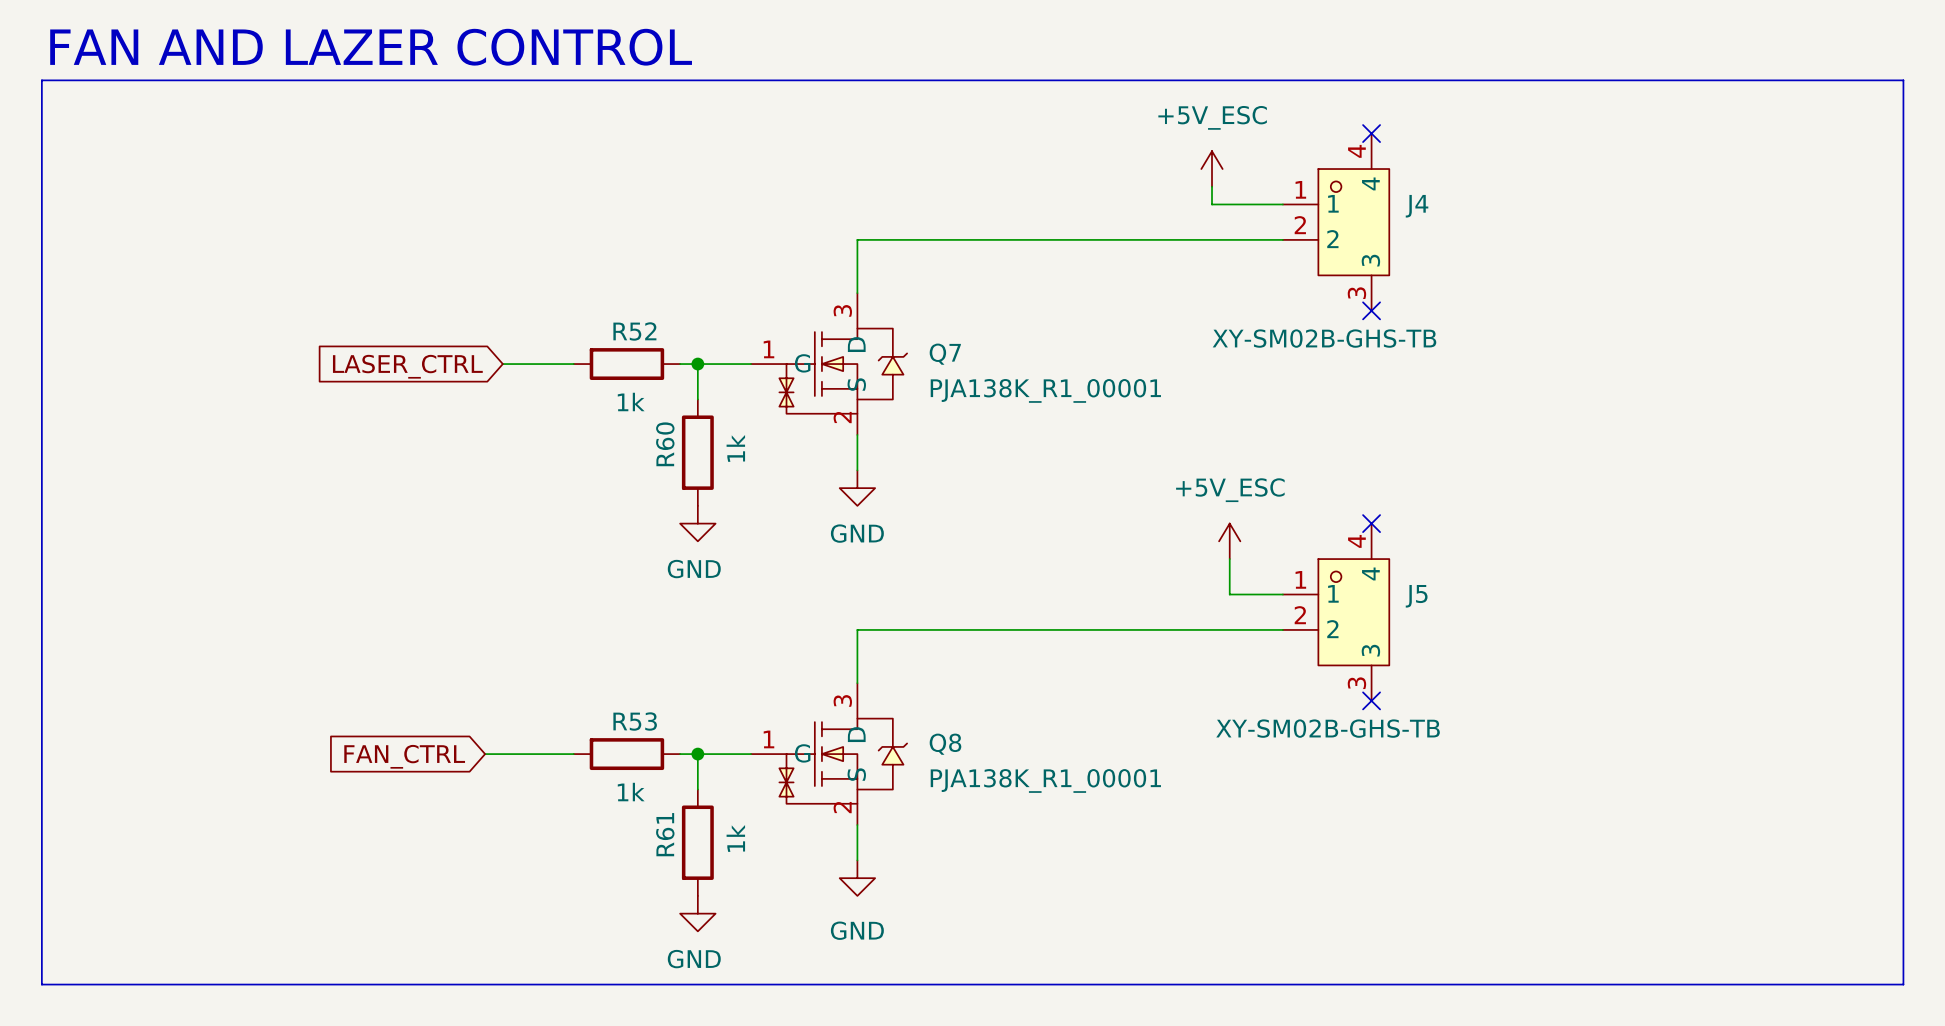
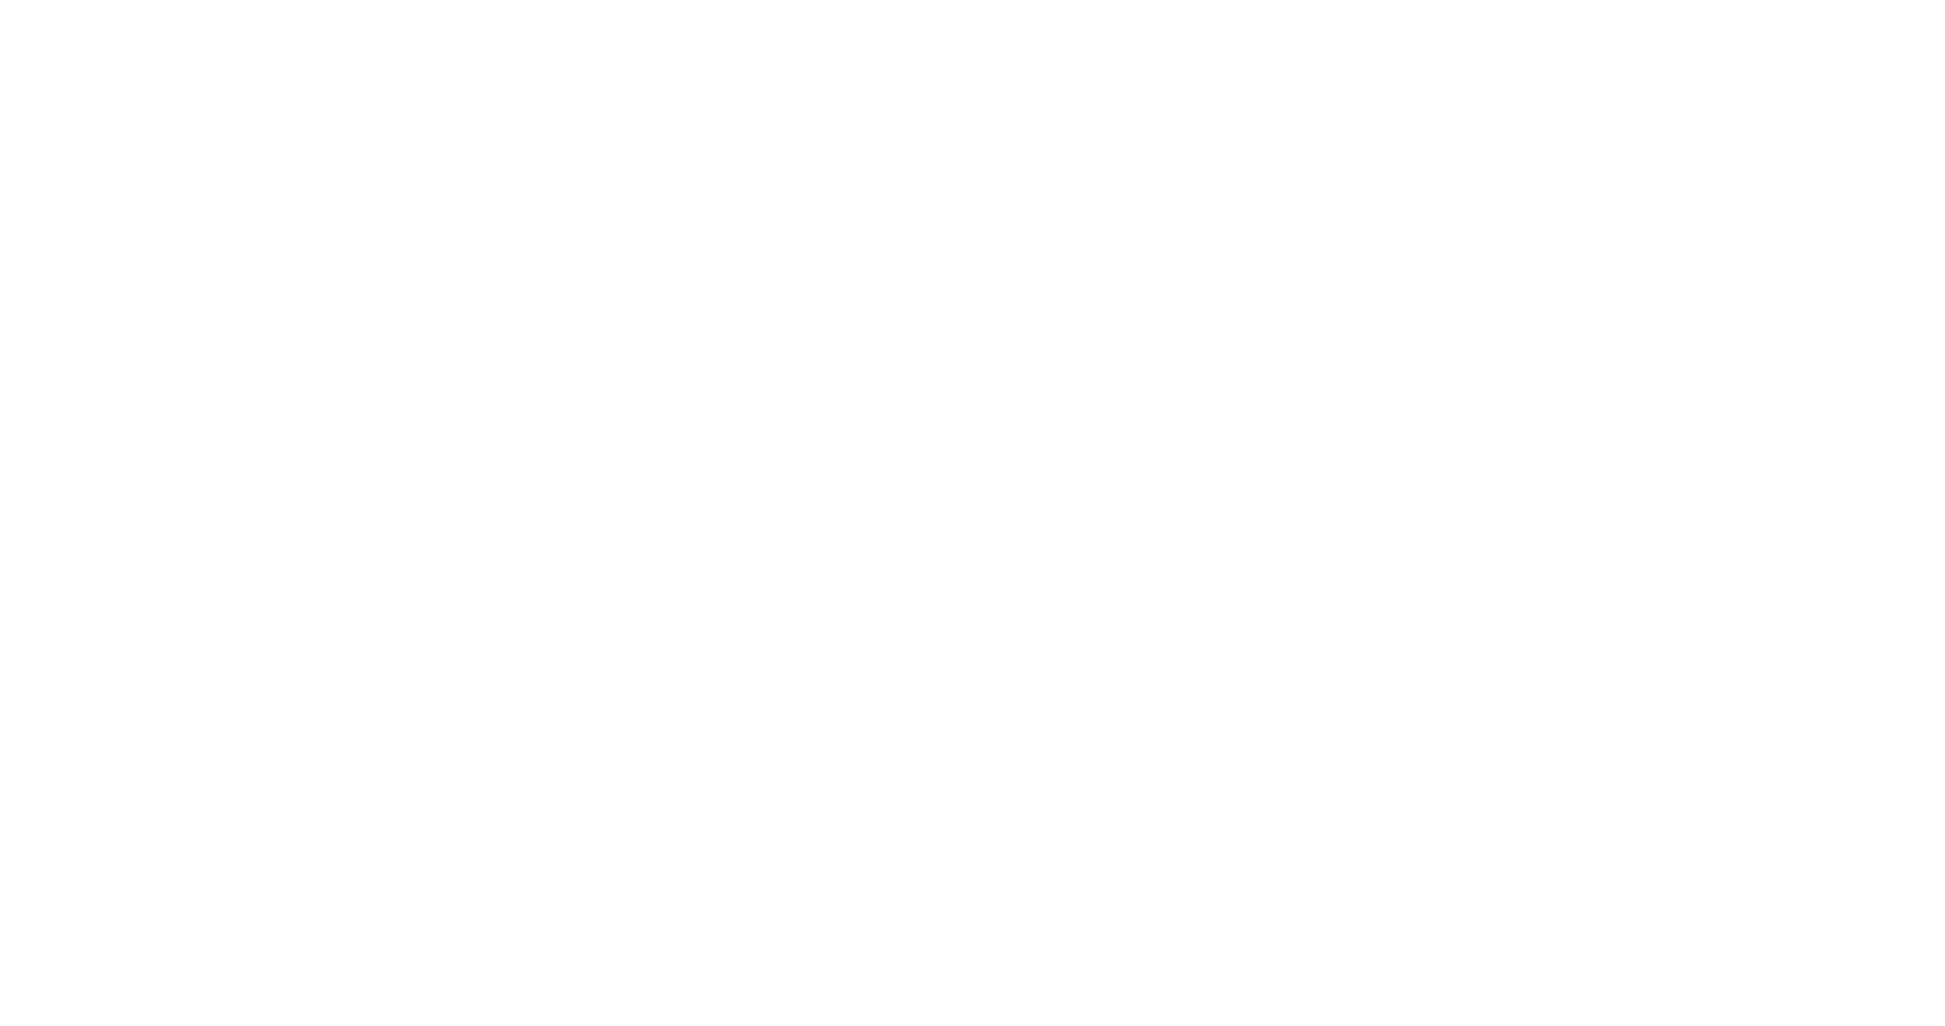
text: FAN AND LAZER CONTROL (371, 47) -> none
line: (41, 80) (1903, 80) (1903, 984) (41, 984) (41, 80) -> none
no-connect mark: (1371, 133) -> none
power symbol: +5V_ESC (1212, 169) -> none
wire: (1212, 186) (1212, 204) (1282, 204) -> none
J4: XY-SM02B-GHS-TB (1336, 222) -> none
wire: (1282, 239) (857, 239) (857, 293) -> none
no-connect mark: (1371, 310) -> none
wire: (502, 364) (573, 364) -> none
R52: 1k (626, 364) -> none
wire: (680, 364) (751, 364) -> none
wire: (697, 364) (697, 399) -> none
junction: (697, 364) -> none
Q7: PJA138K_R1_00001 (829, 364) -> none
global label: LASER_CTRL (407, 366) -> none
wire: (857, 434) (857, 470) -> none
R60: 1k (697, 452) -> none
power symbol: GND (857, 488) -> none
power symbol: GND (697, 523) -> none
no-connect mark: (1371, 523) -> none
power symbol: +5V_ESC (1229, 541) -> none
wire: (1229, 559) (1229, 594) (1282, 594) -> none
J5: XY-SM02B-GHS-TB (1336, 612) -> none
wire: (1282, 629) (857, 629) (857, 683) -> none
no-connect mark: (1371, 700) -> none
wire: (485, 754) (573, 754) -> none
R53: 1k (626, 754) -> none
wire: (680, 754) (751, 754) -> none
wire: (697, 754) (697, 789) -> none
junction: (697, 754) -> none
Q8: PJA138K_R1_00001 (829, 754) -> none
global label: FAN_CTRL (404, 756) -> none
wire: (857, 824) (857, 860) -> none
R61: 1k (697, 842) -> none
power symbol: GND (857, 878) -> none
power symbol: GND (697, 913) -> none

